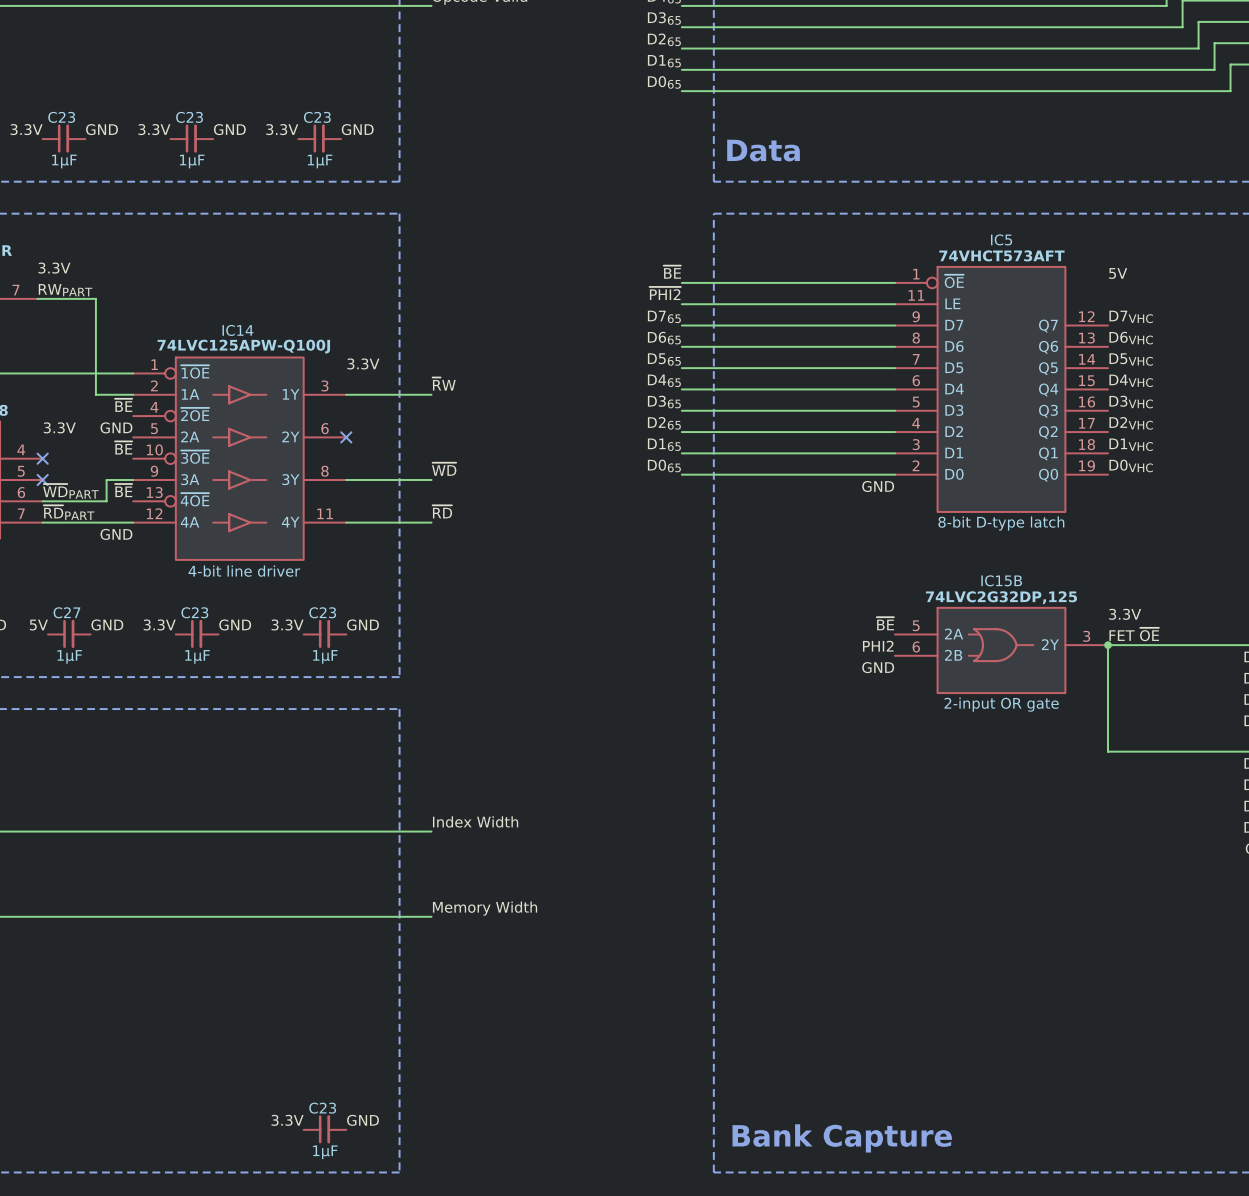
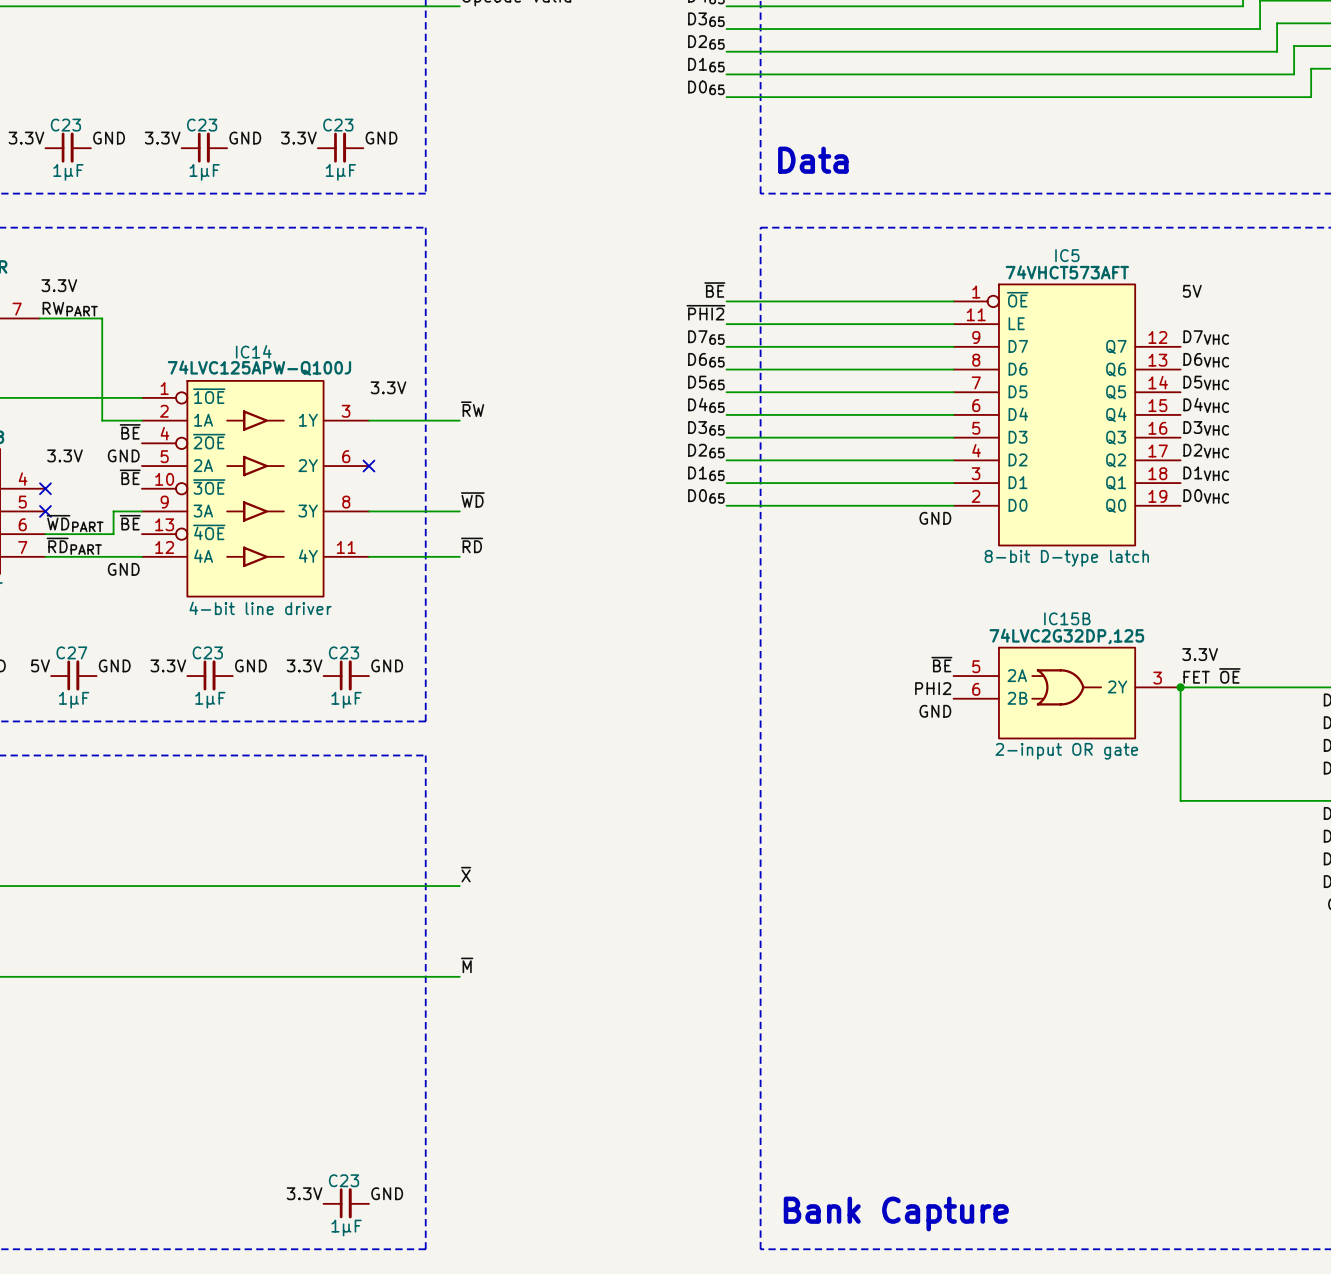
label: Index Width (475, 821) -> ~{X} (466, 874)
label: Memory Width (485, 908) -> ~{M} (467, 965)

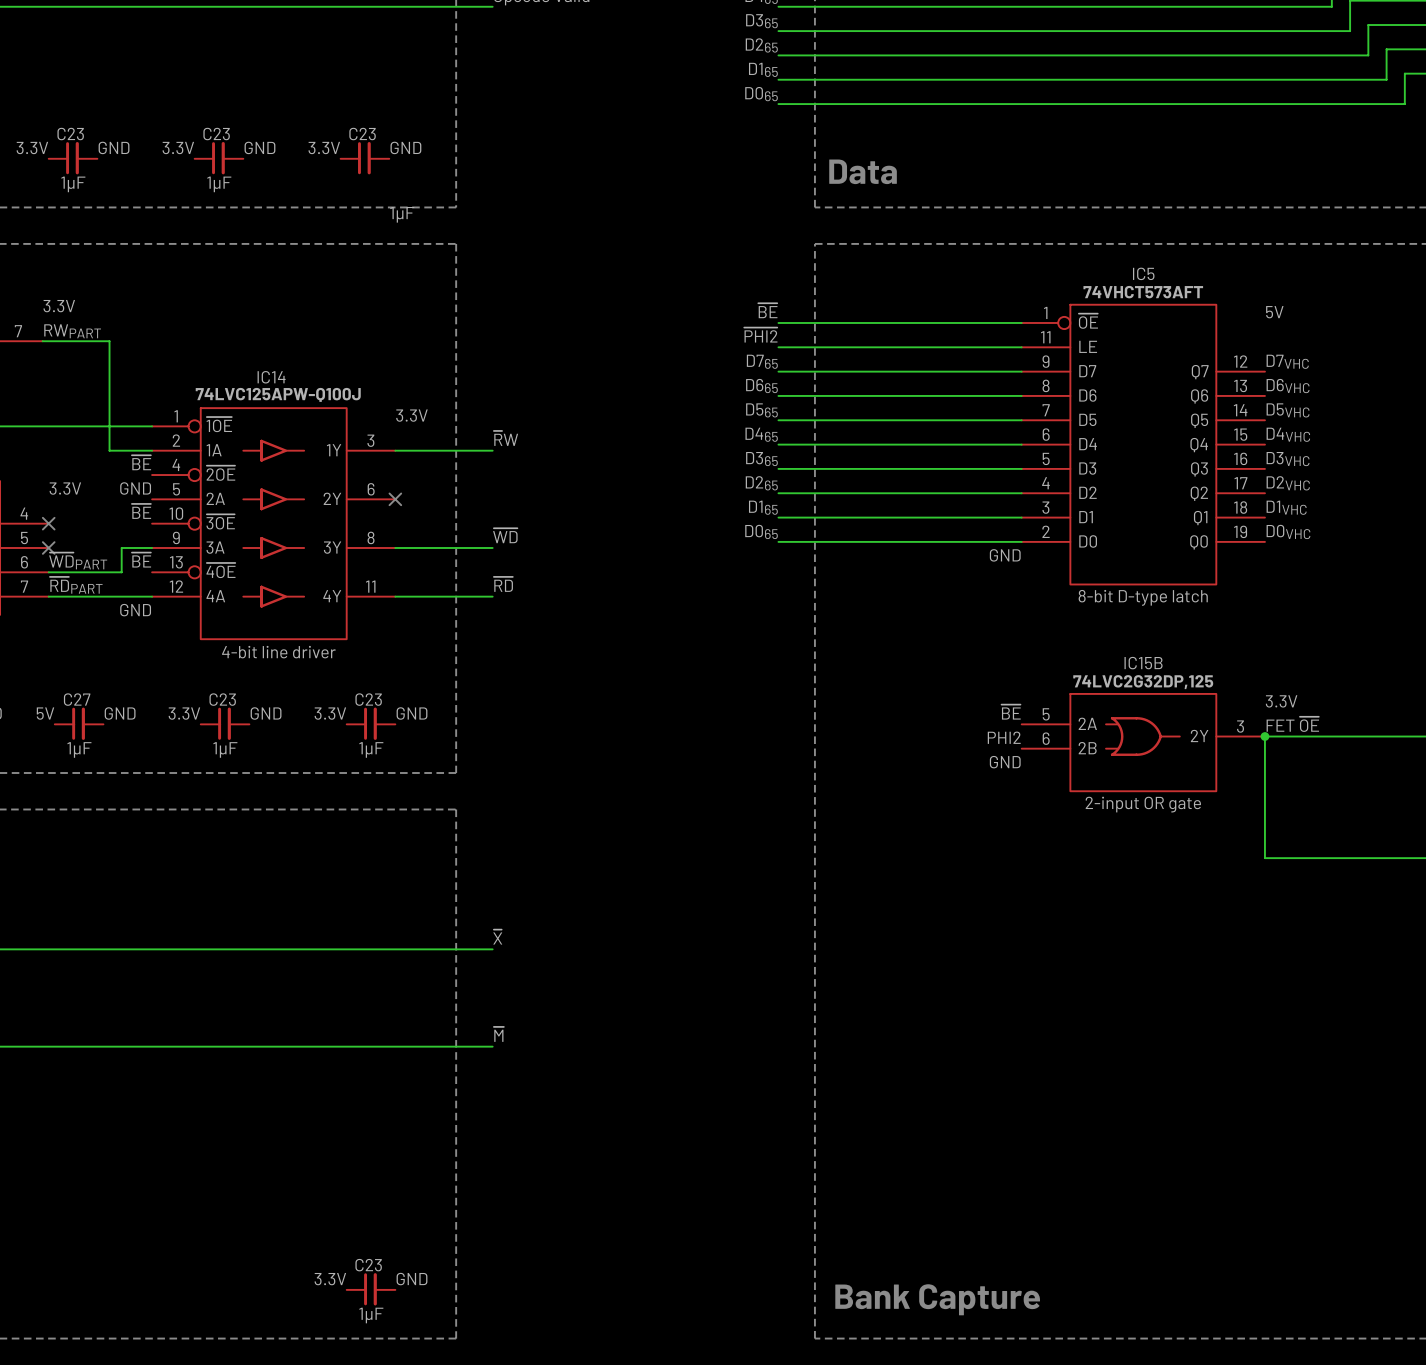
C23 text: 1μF (340, 172) -> none
C23 value: none -> 1μF (402, 214)

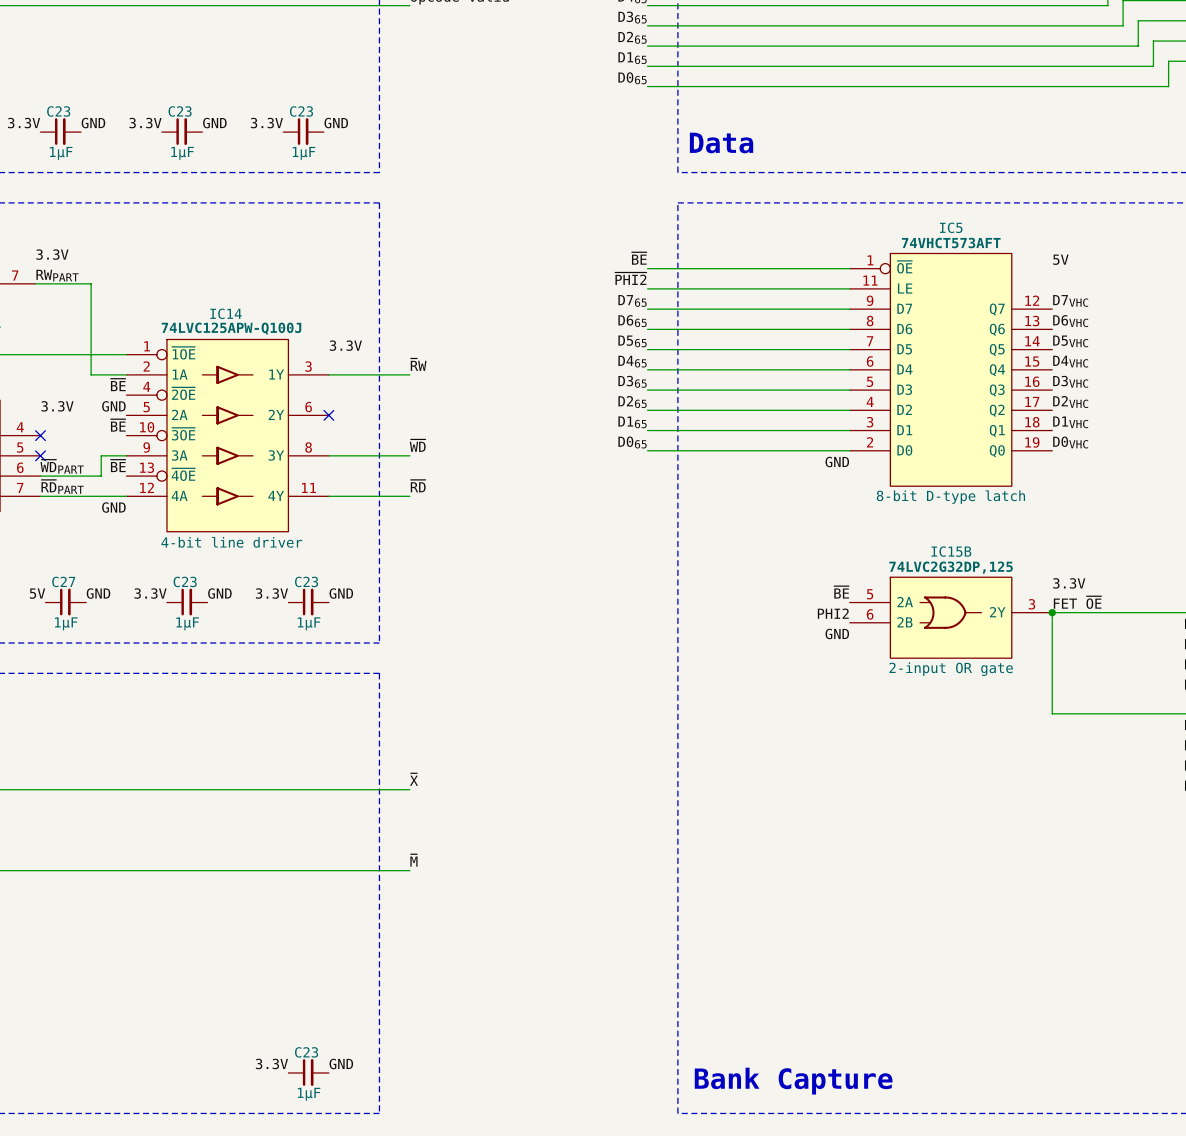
C23 value position: 1μF (402, 214) -> 1μF (304, 153)

